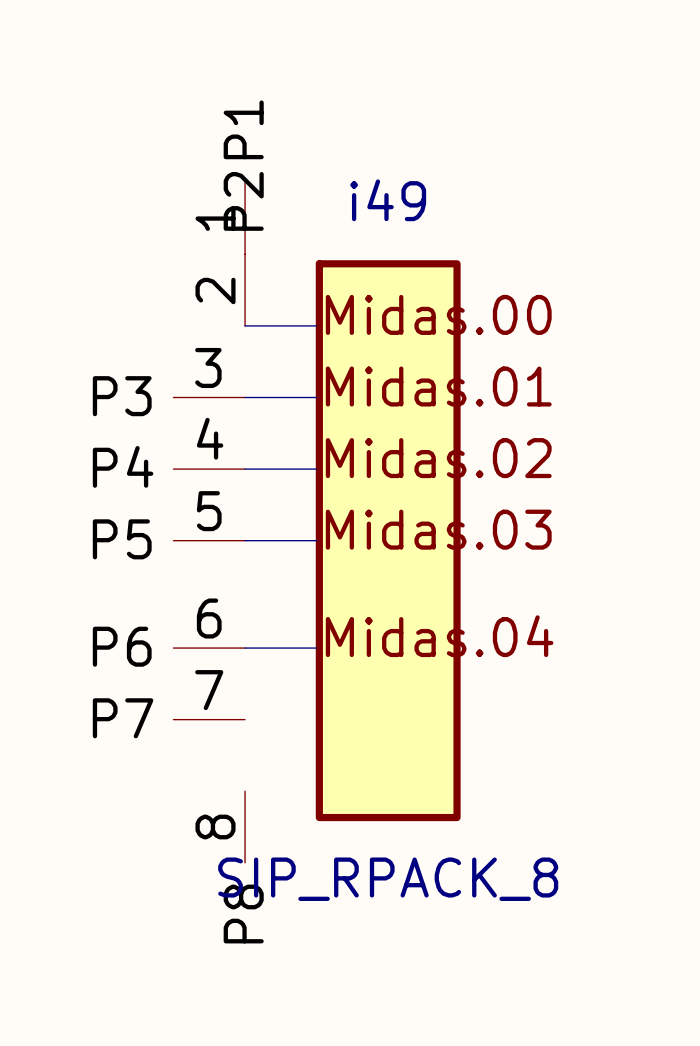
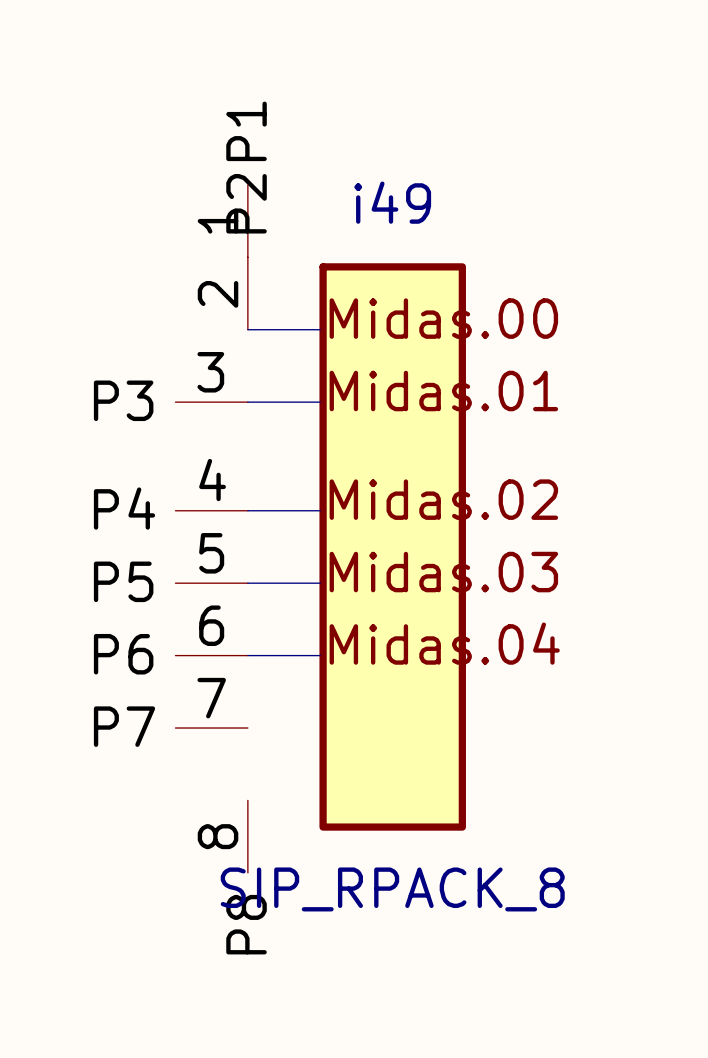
i49 symbol: [173, 182, 461, 863] -> [175, 184, 466, 873]
label position: Midas.02 (438, 458) -> Midas.02 (443, 499)
wire: (245, 469) (316, 469) -> (247, 510) (320, 510)
label position: Midas.03 (438, 529) -> Midas.03 (443, 572)
wire: (245, 540) (316, 540) -> (247, 583) (320, 583)

